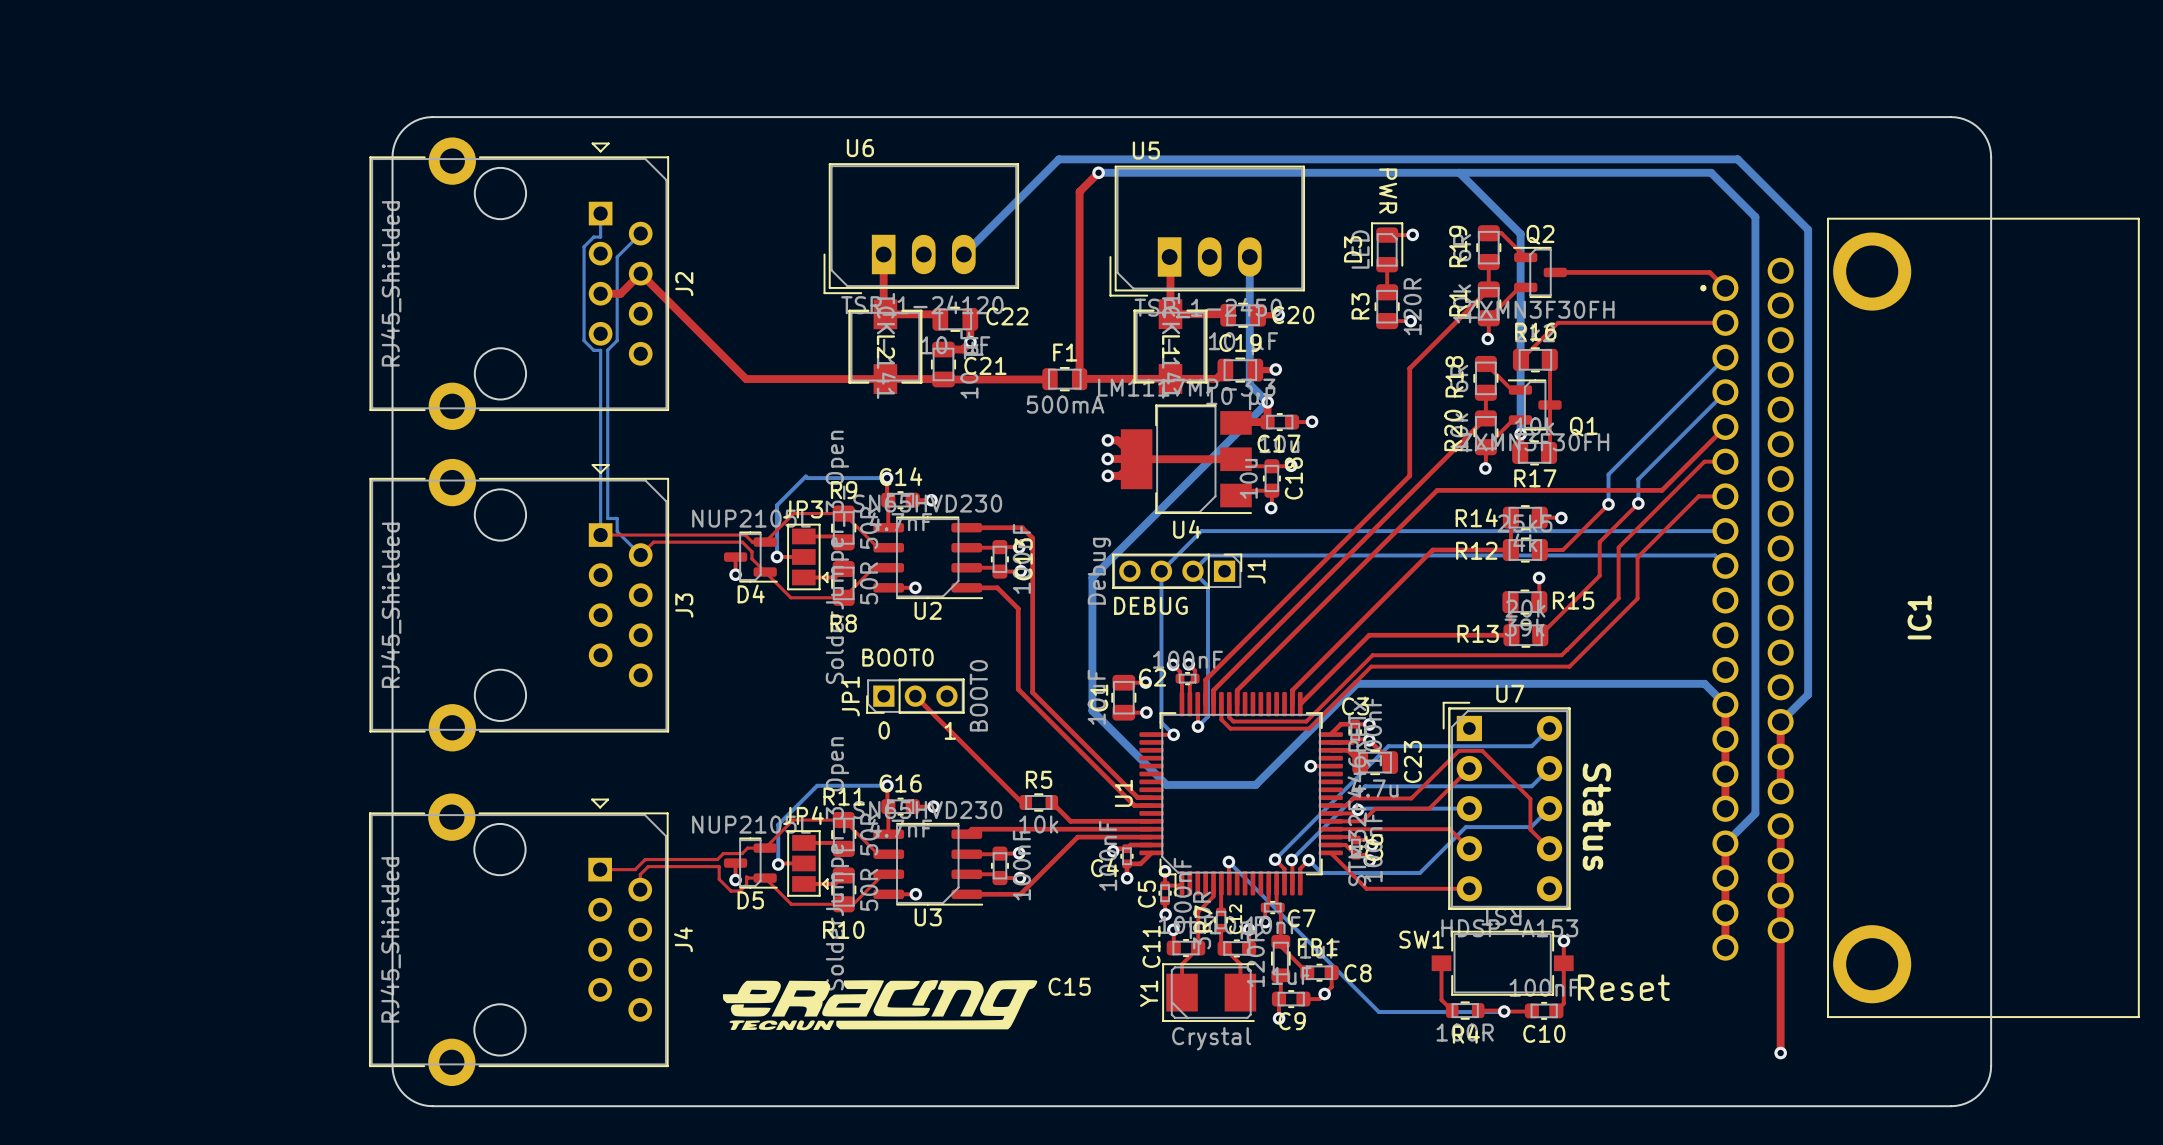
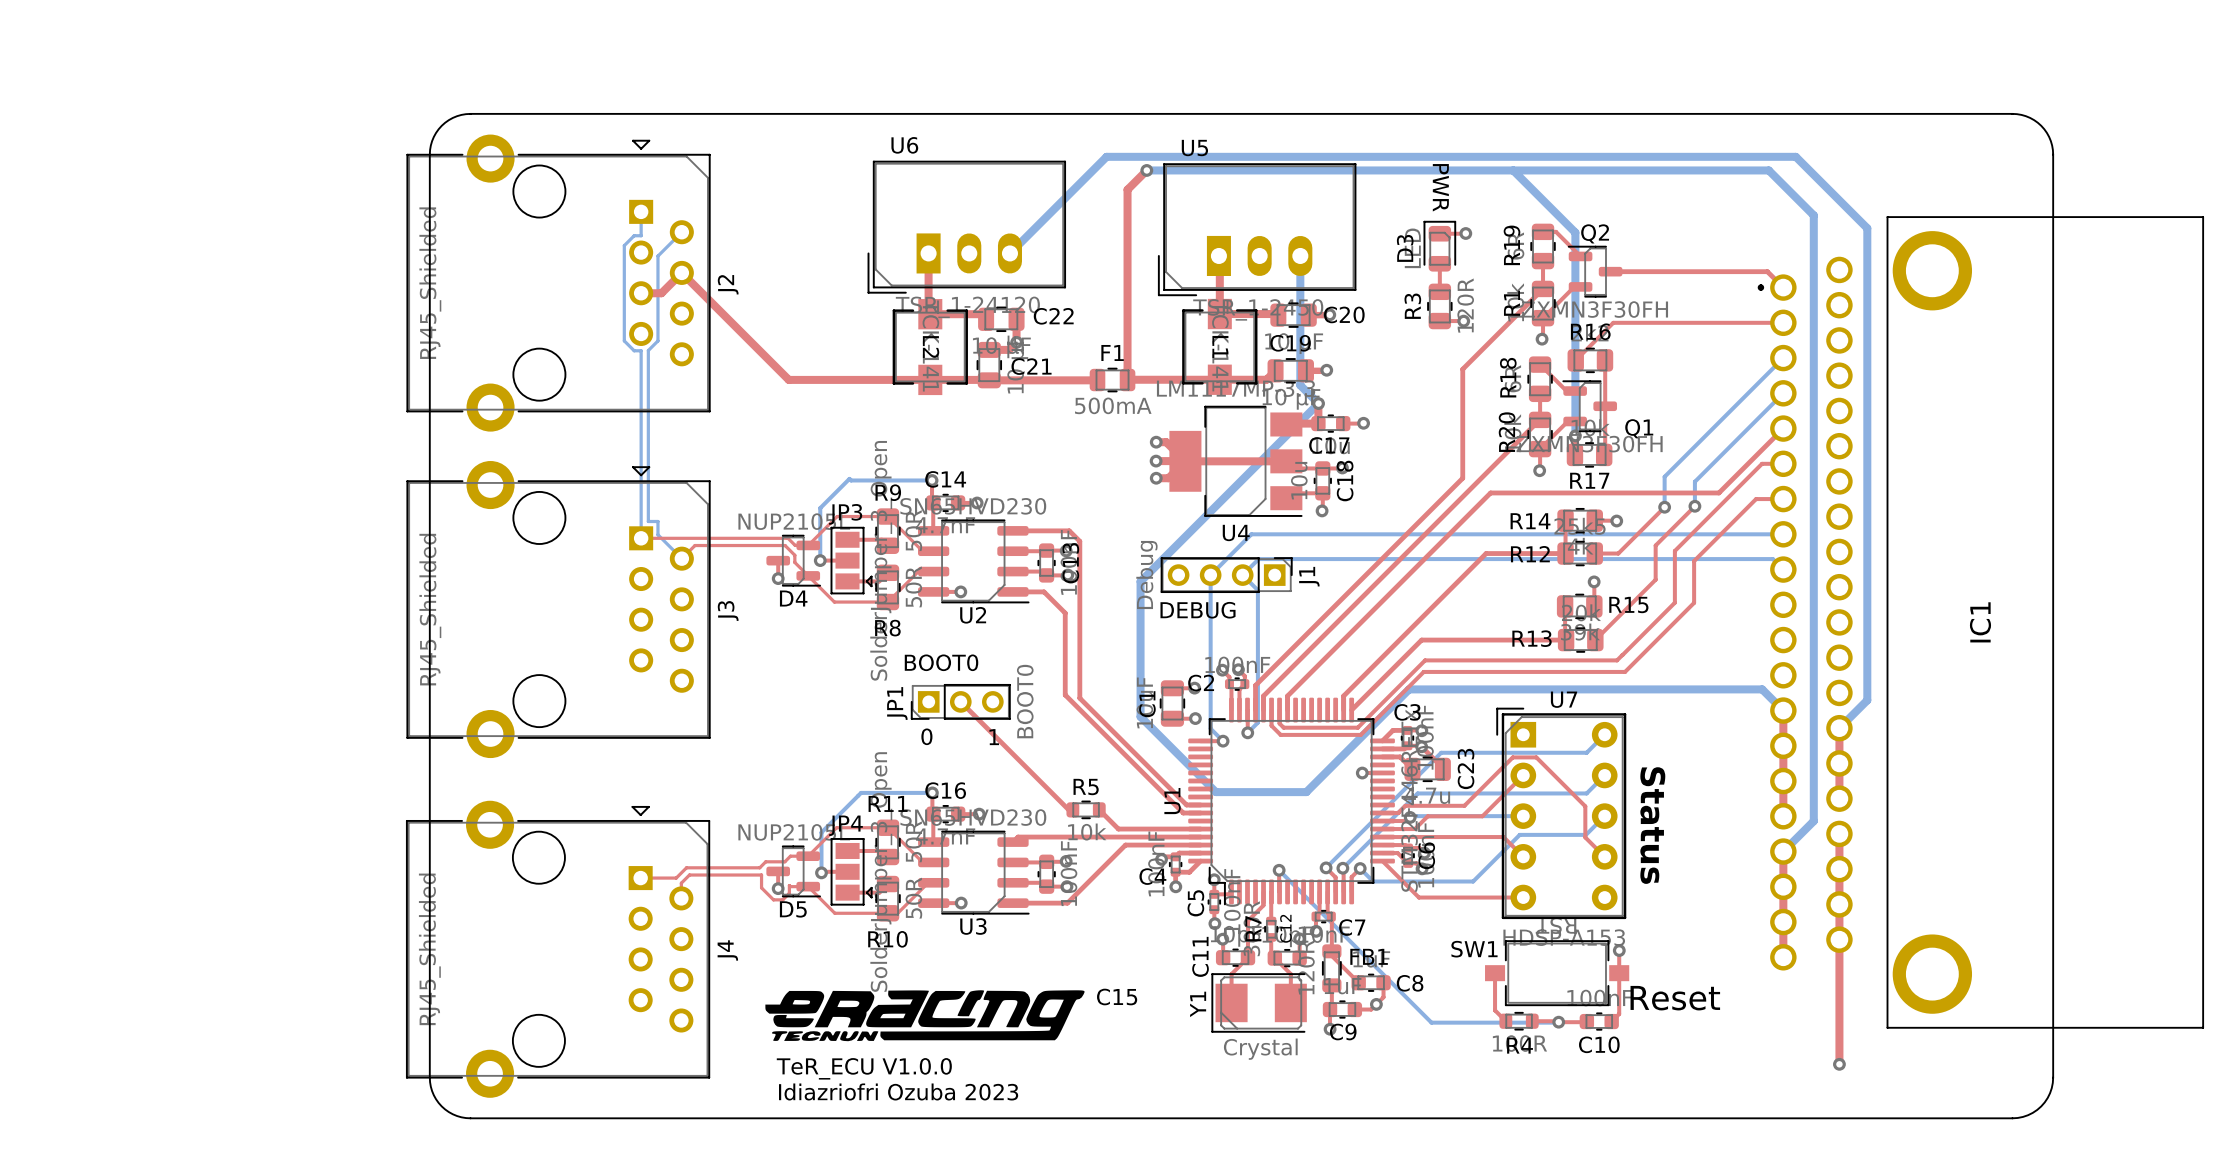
text: none -> TeR_ECU V1.0.0 (864, 1068)
text: none -> Idiazriofri Ozuba 2023 (898, 1091)

